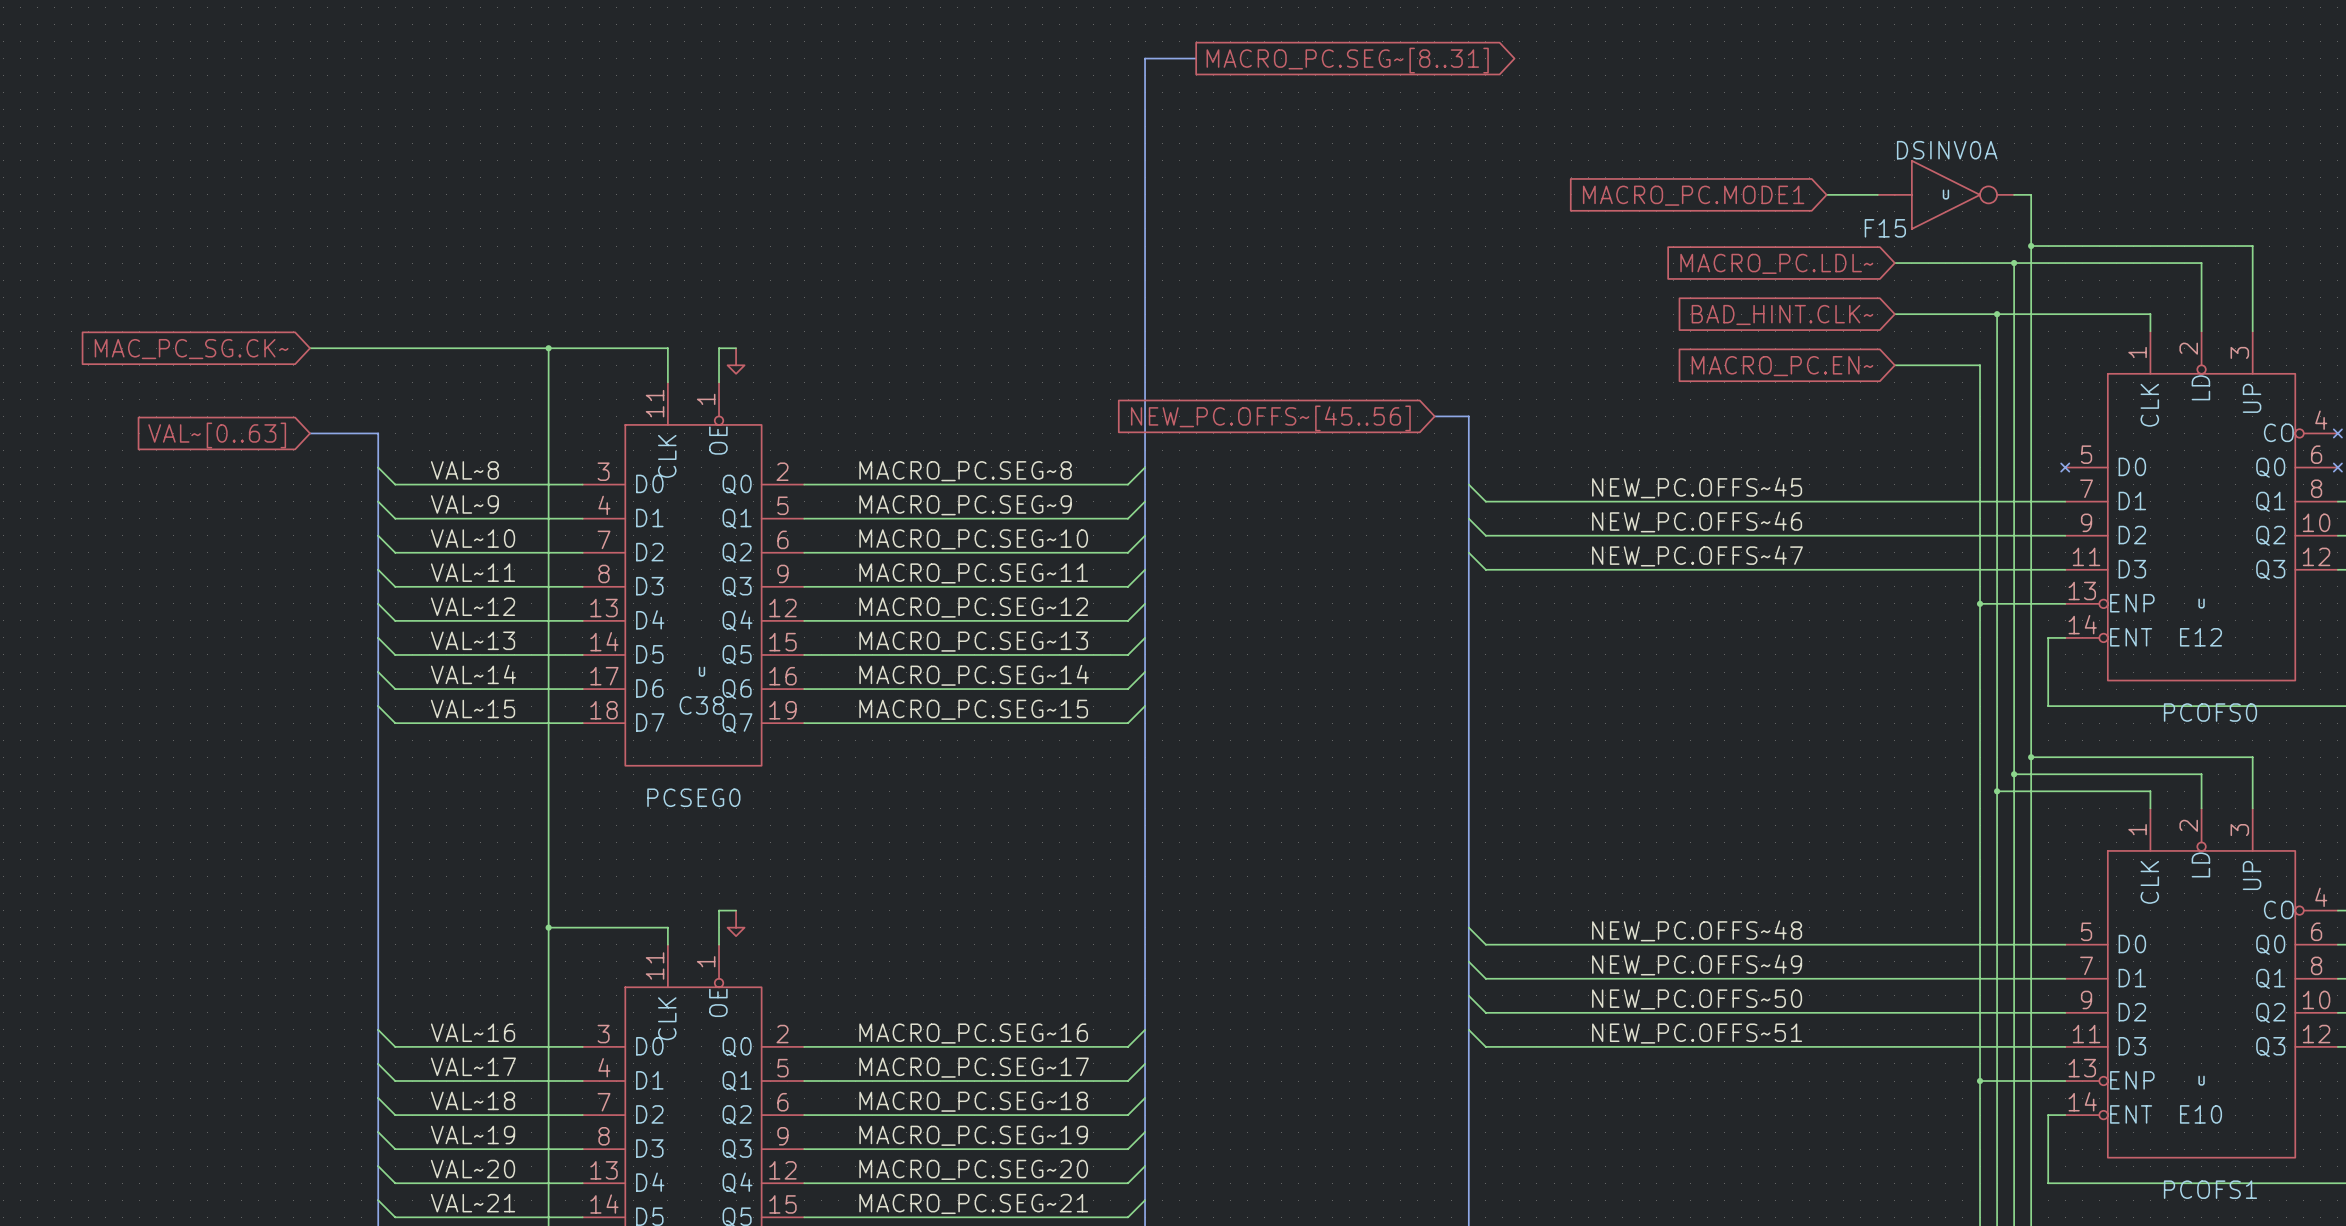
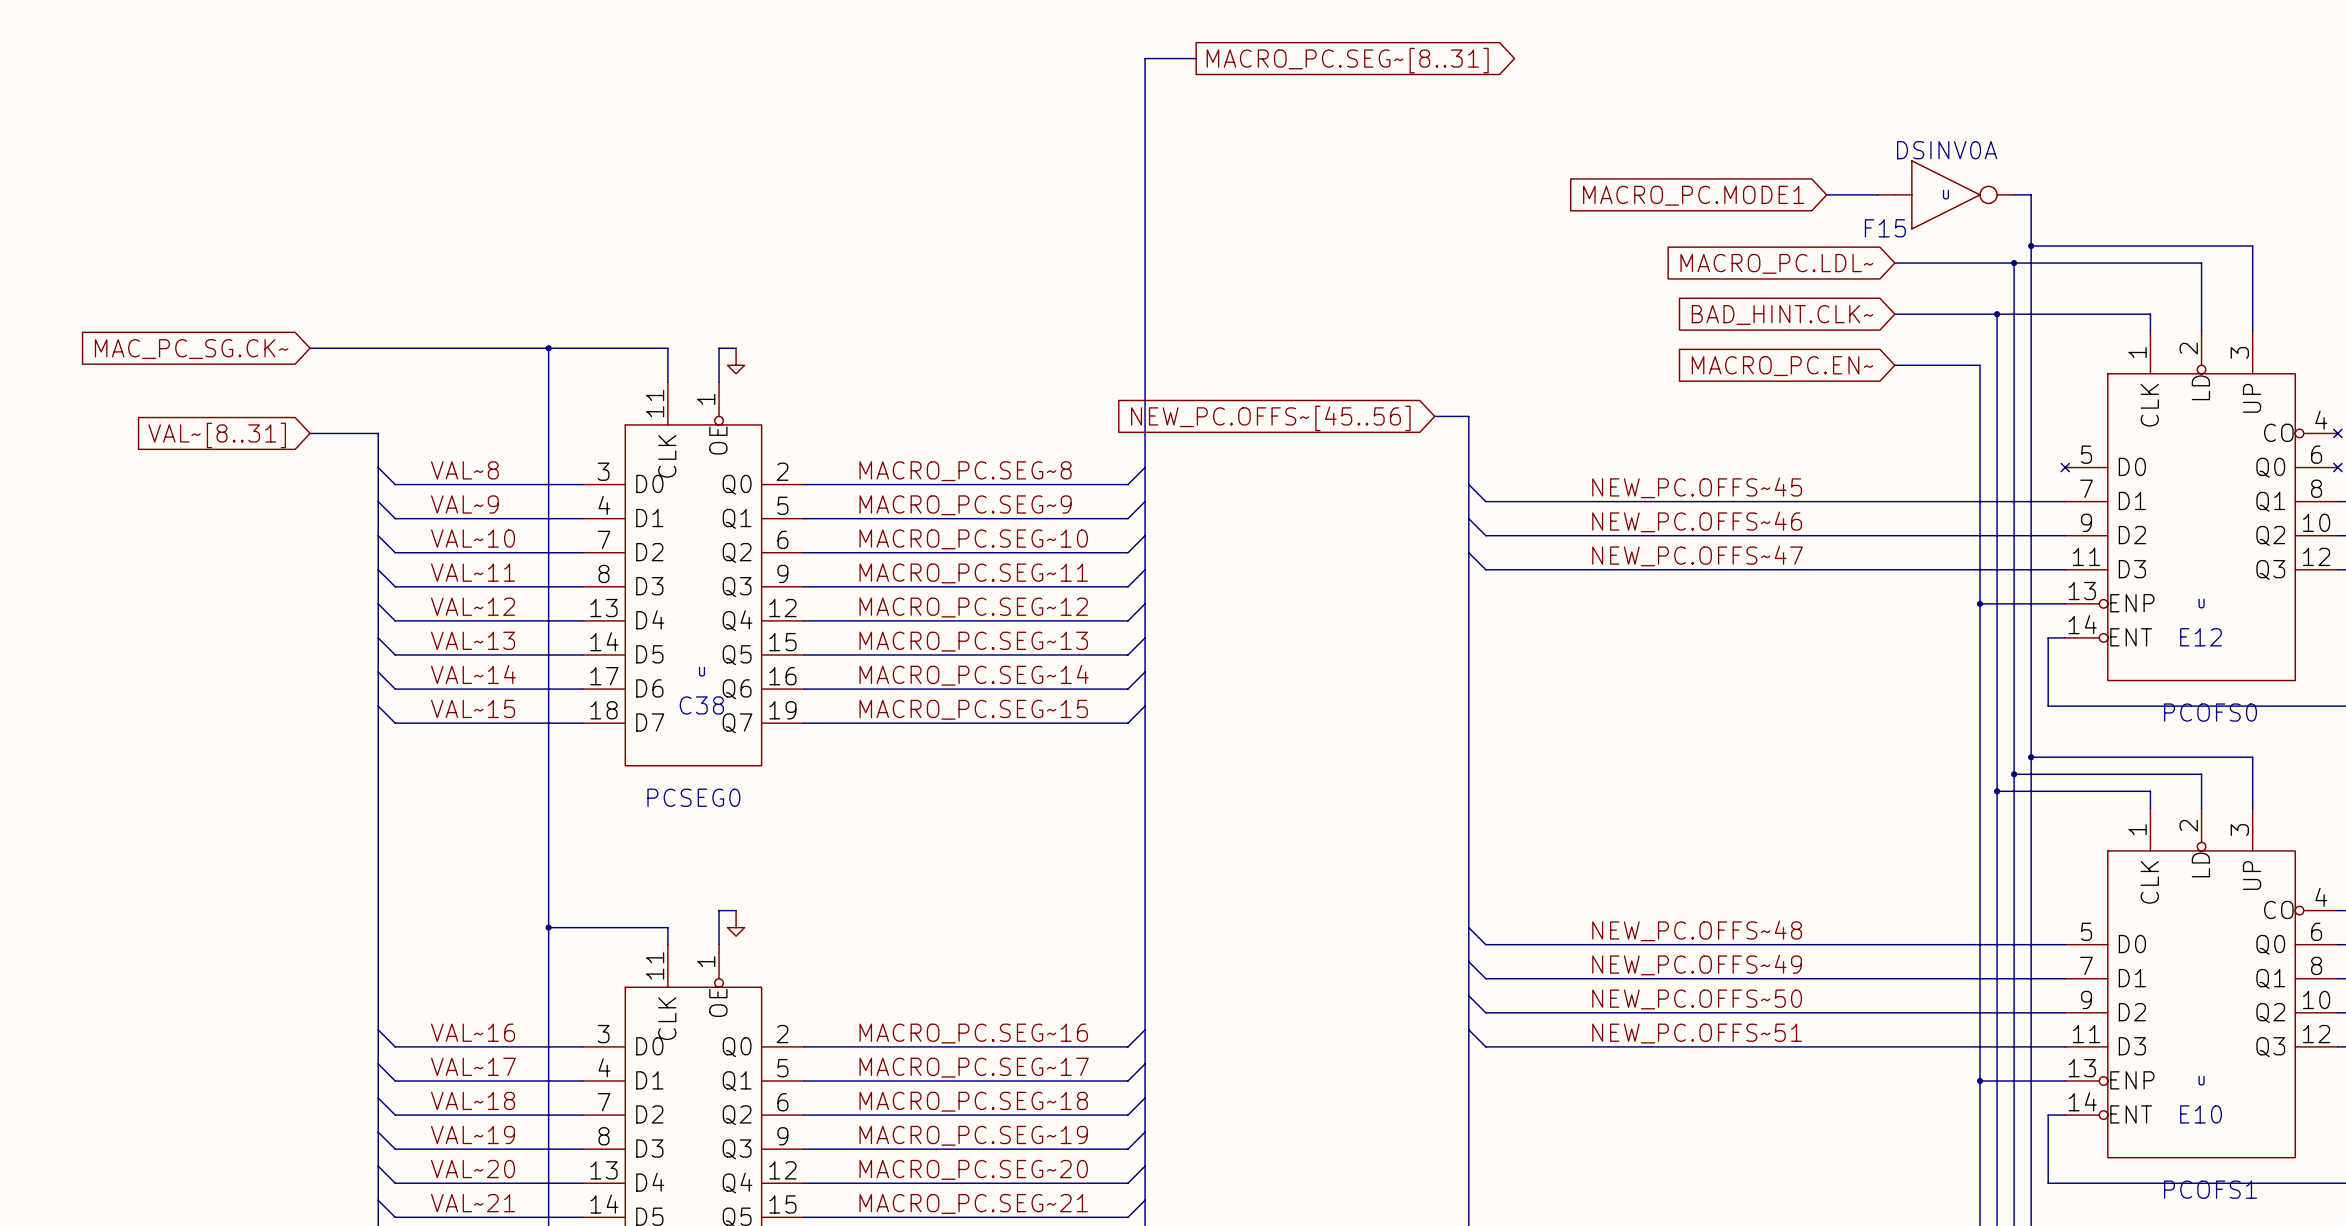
global label: VAL~[0..63] (217, 435) -> VAL~[8..31] (217, 435)

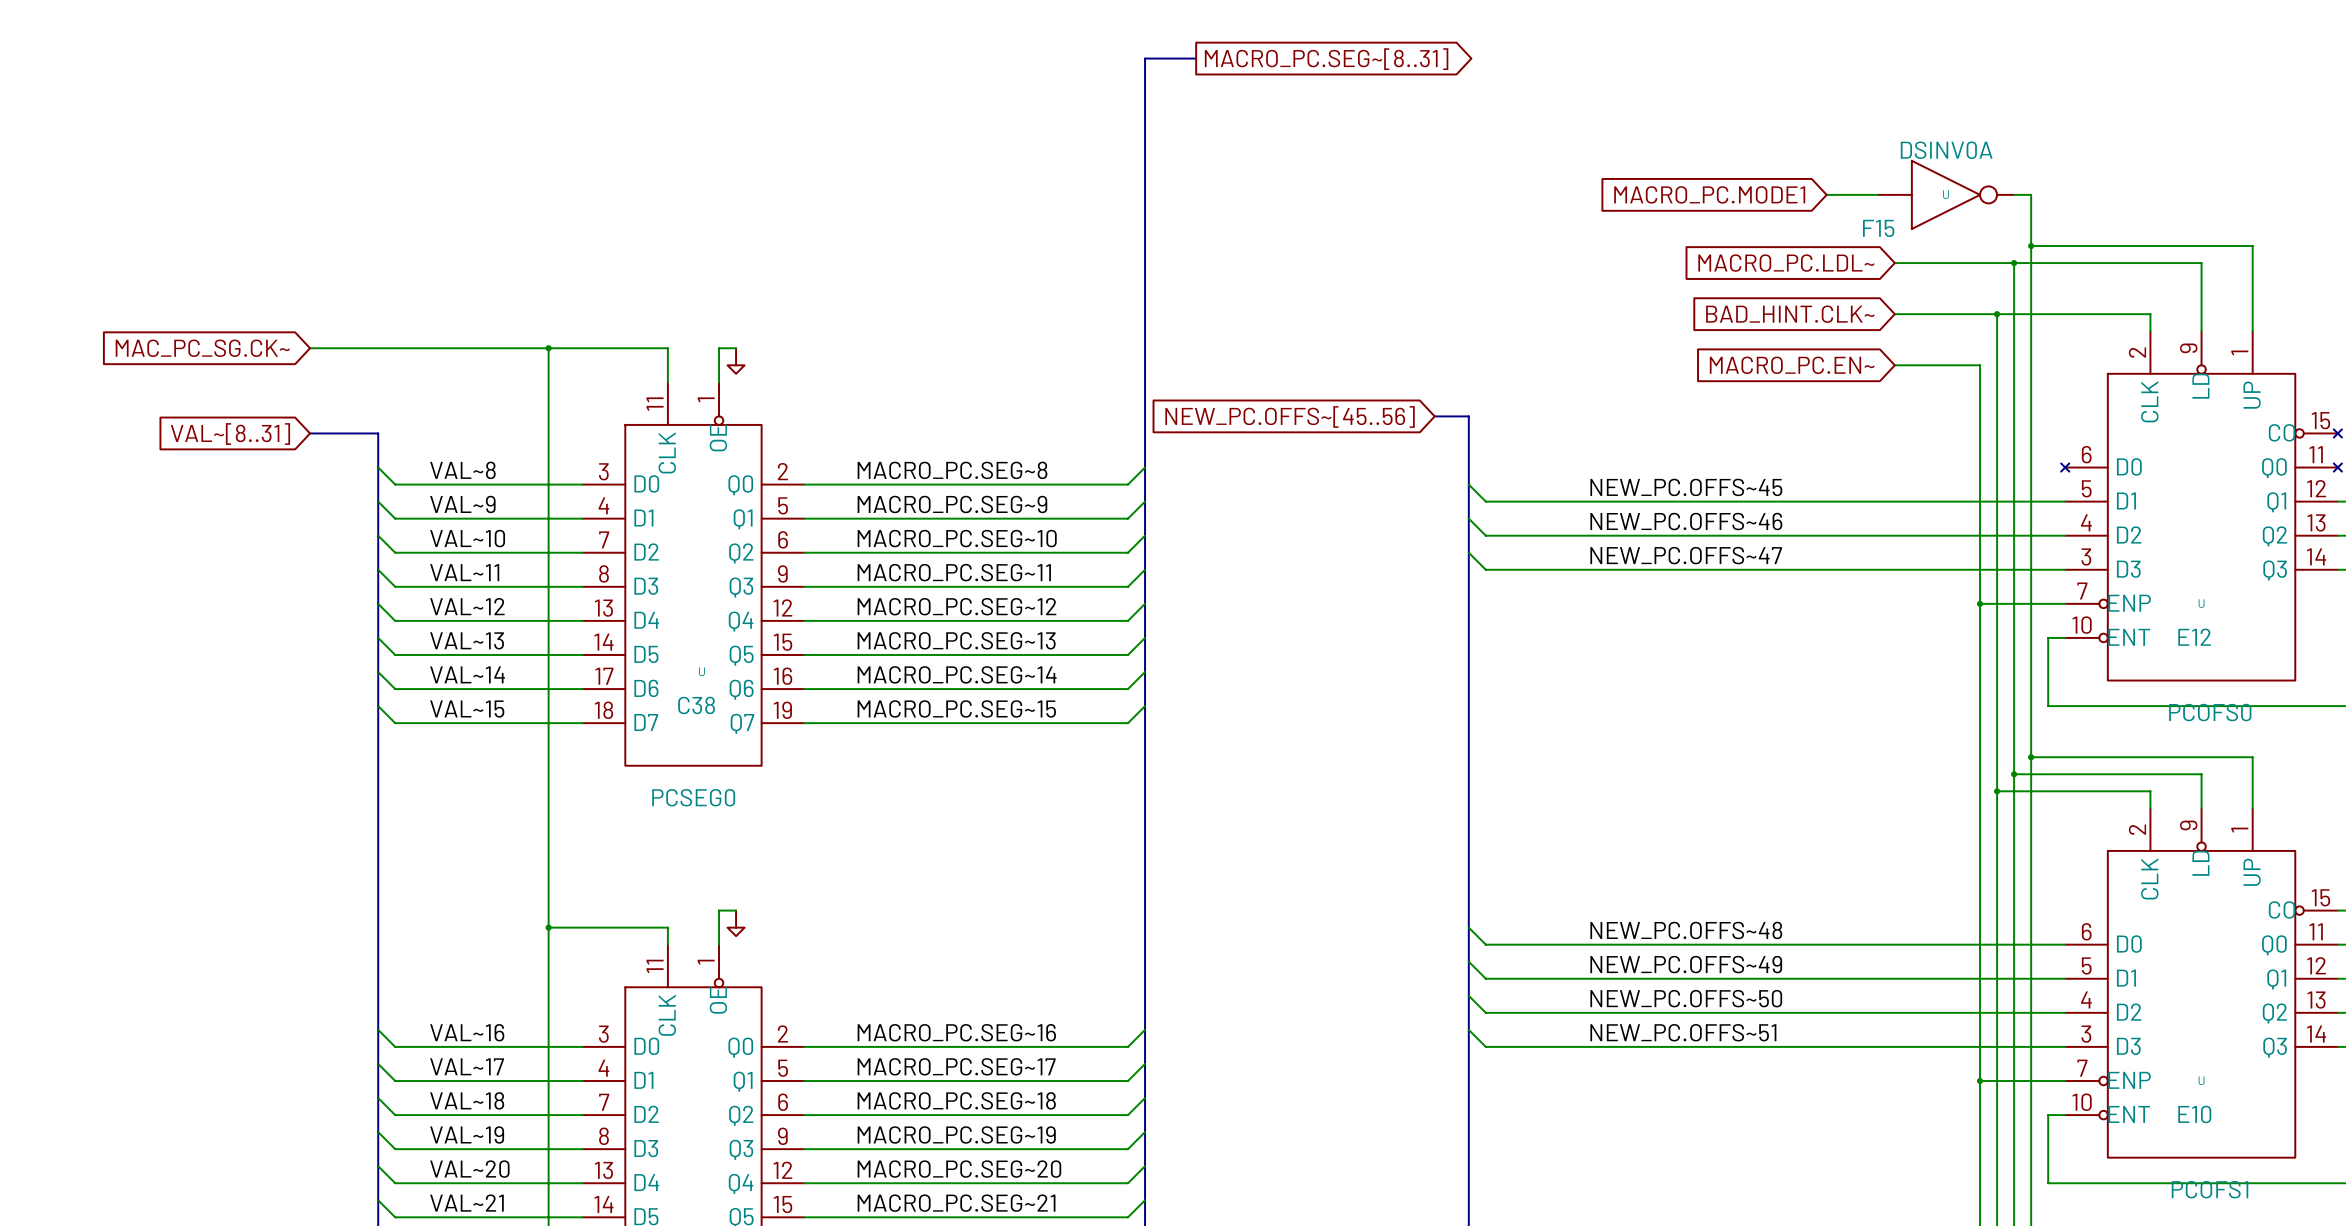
U symbol: [2065, 331, 2338, 681] -> [2065, 331, 2338, 681]
U symbol: [2065, 808, 2338, 1158] -> [2065, 808, 2338, 1158]

